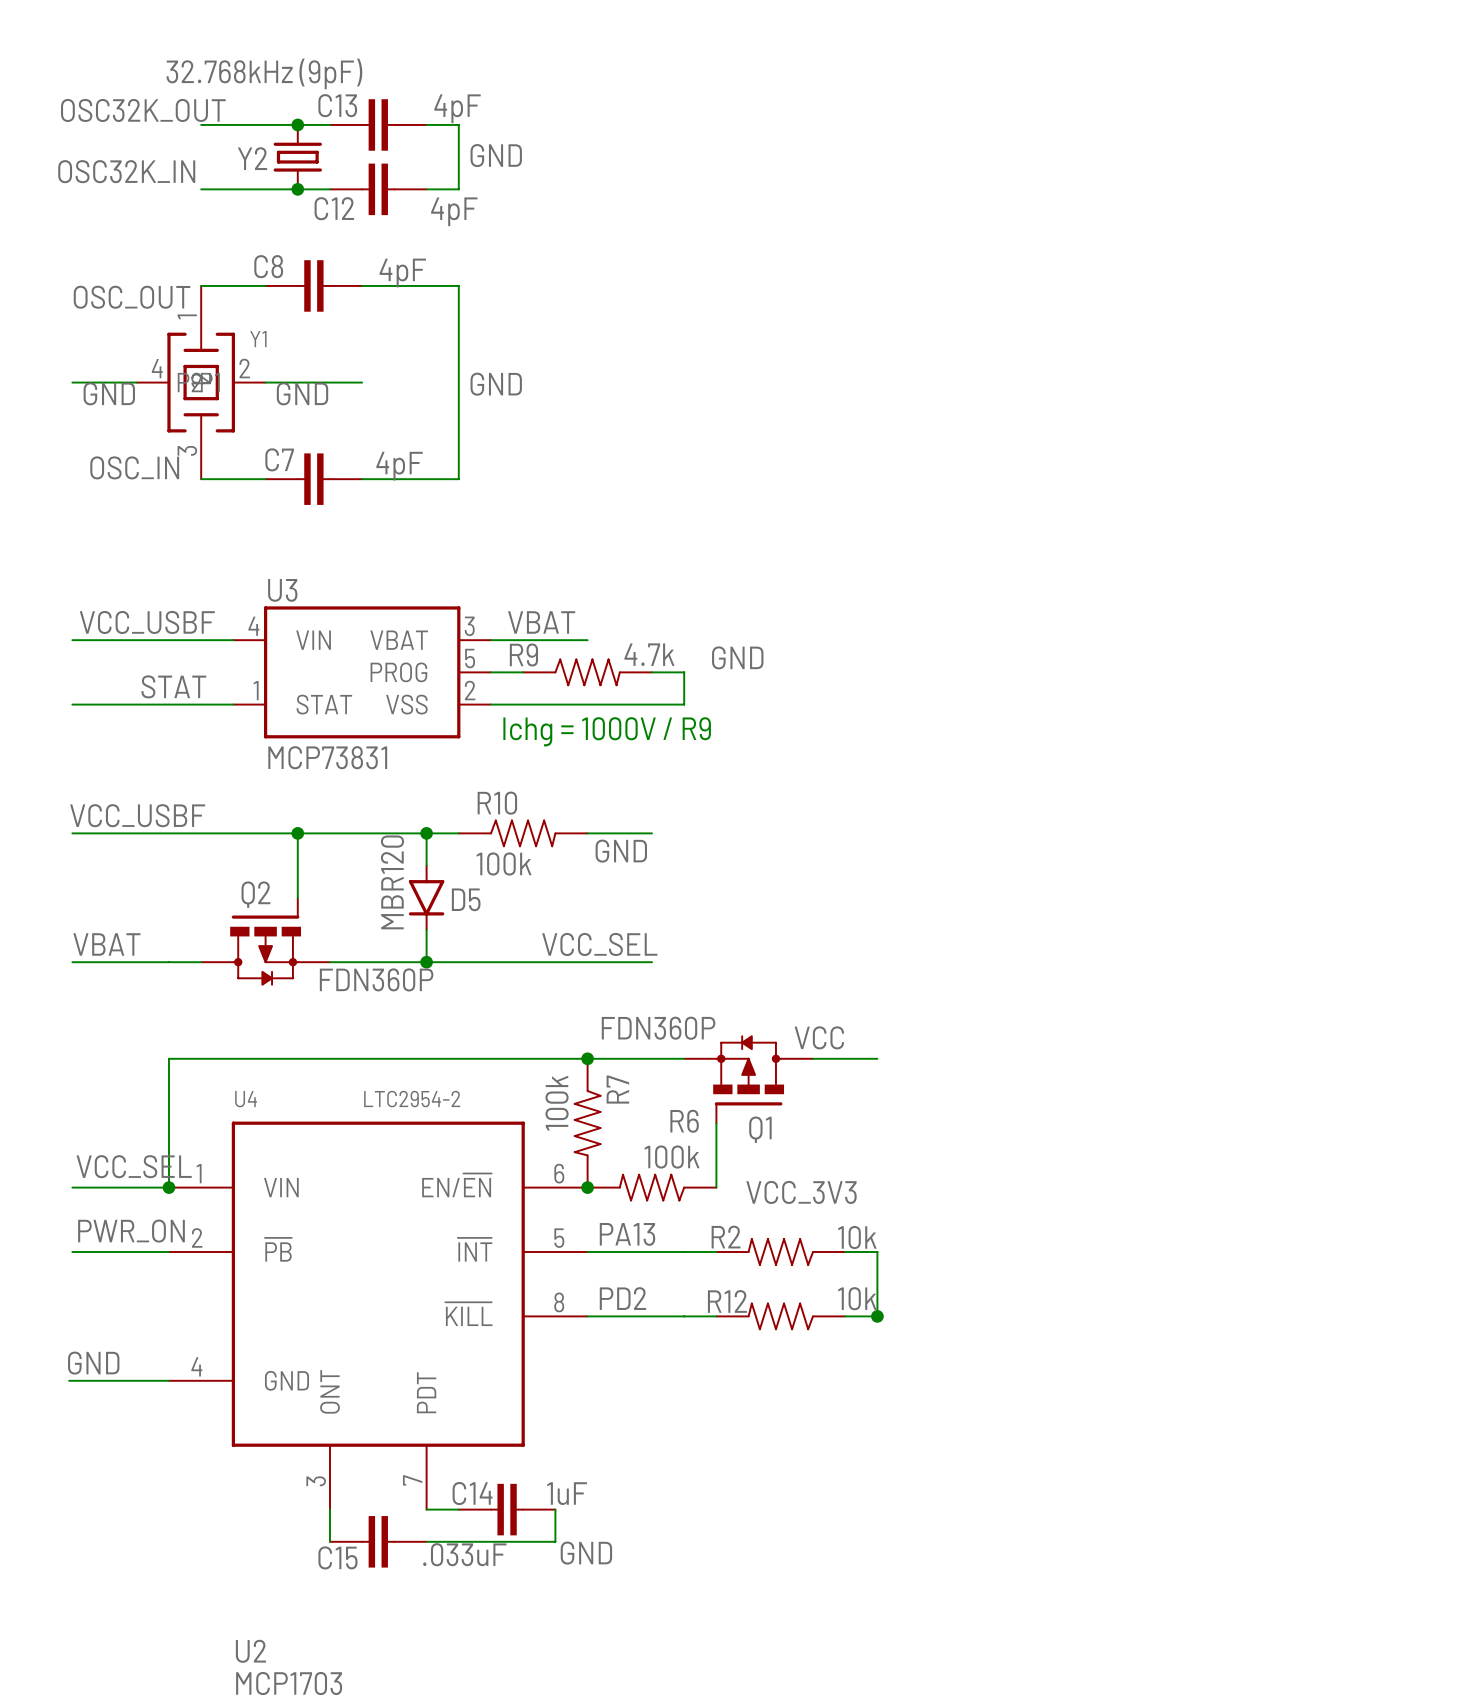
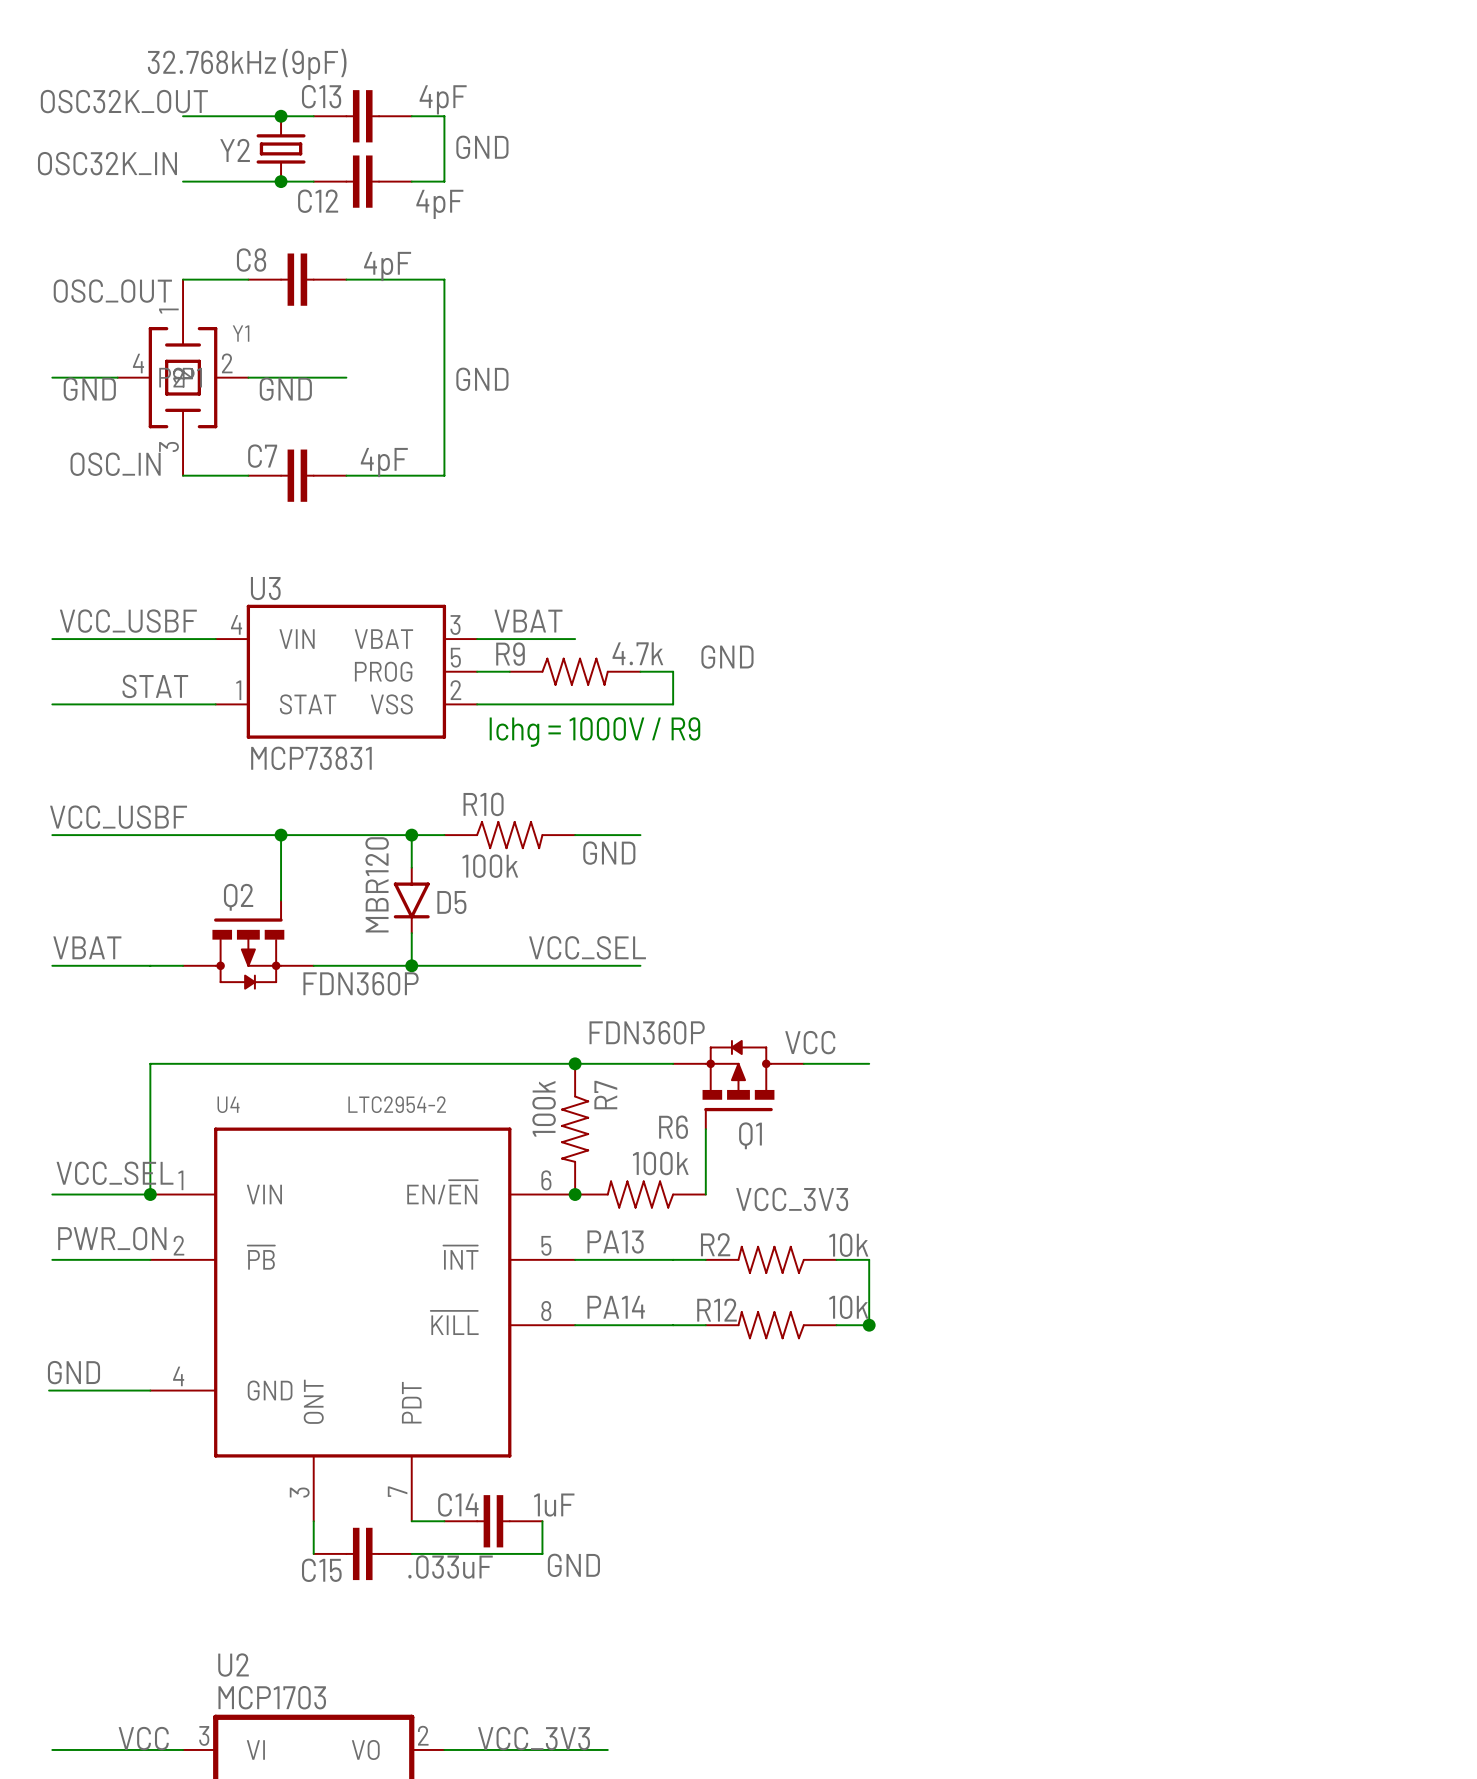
label: PD2 (622, 1298) -> PA14 (616, 1307)

